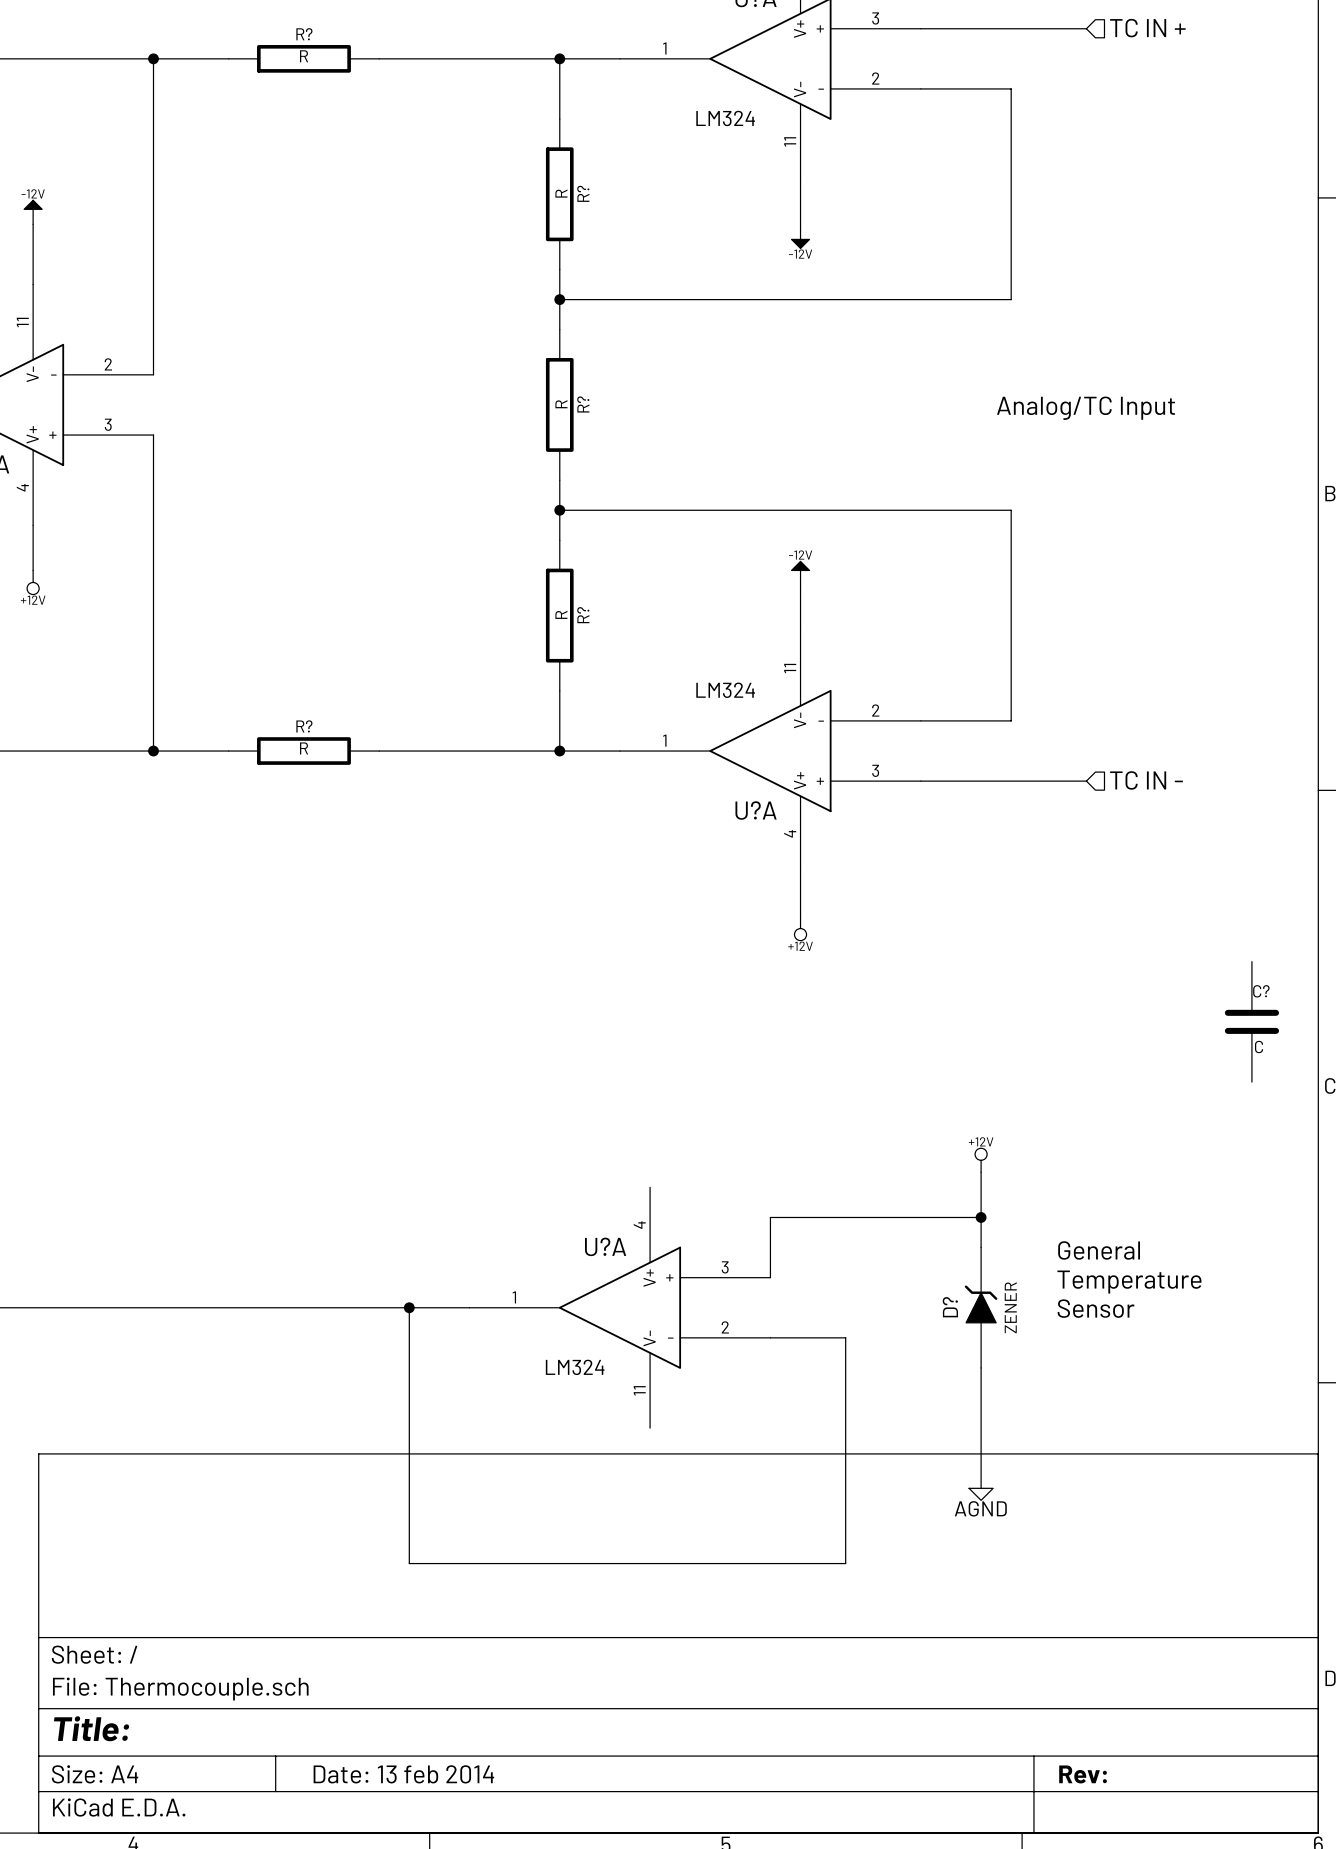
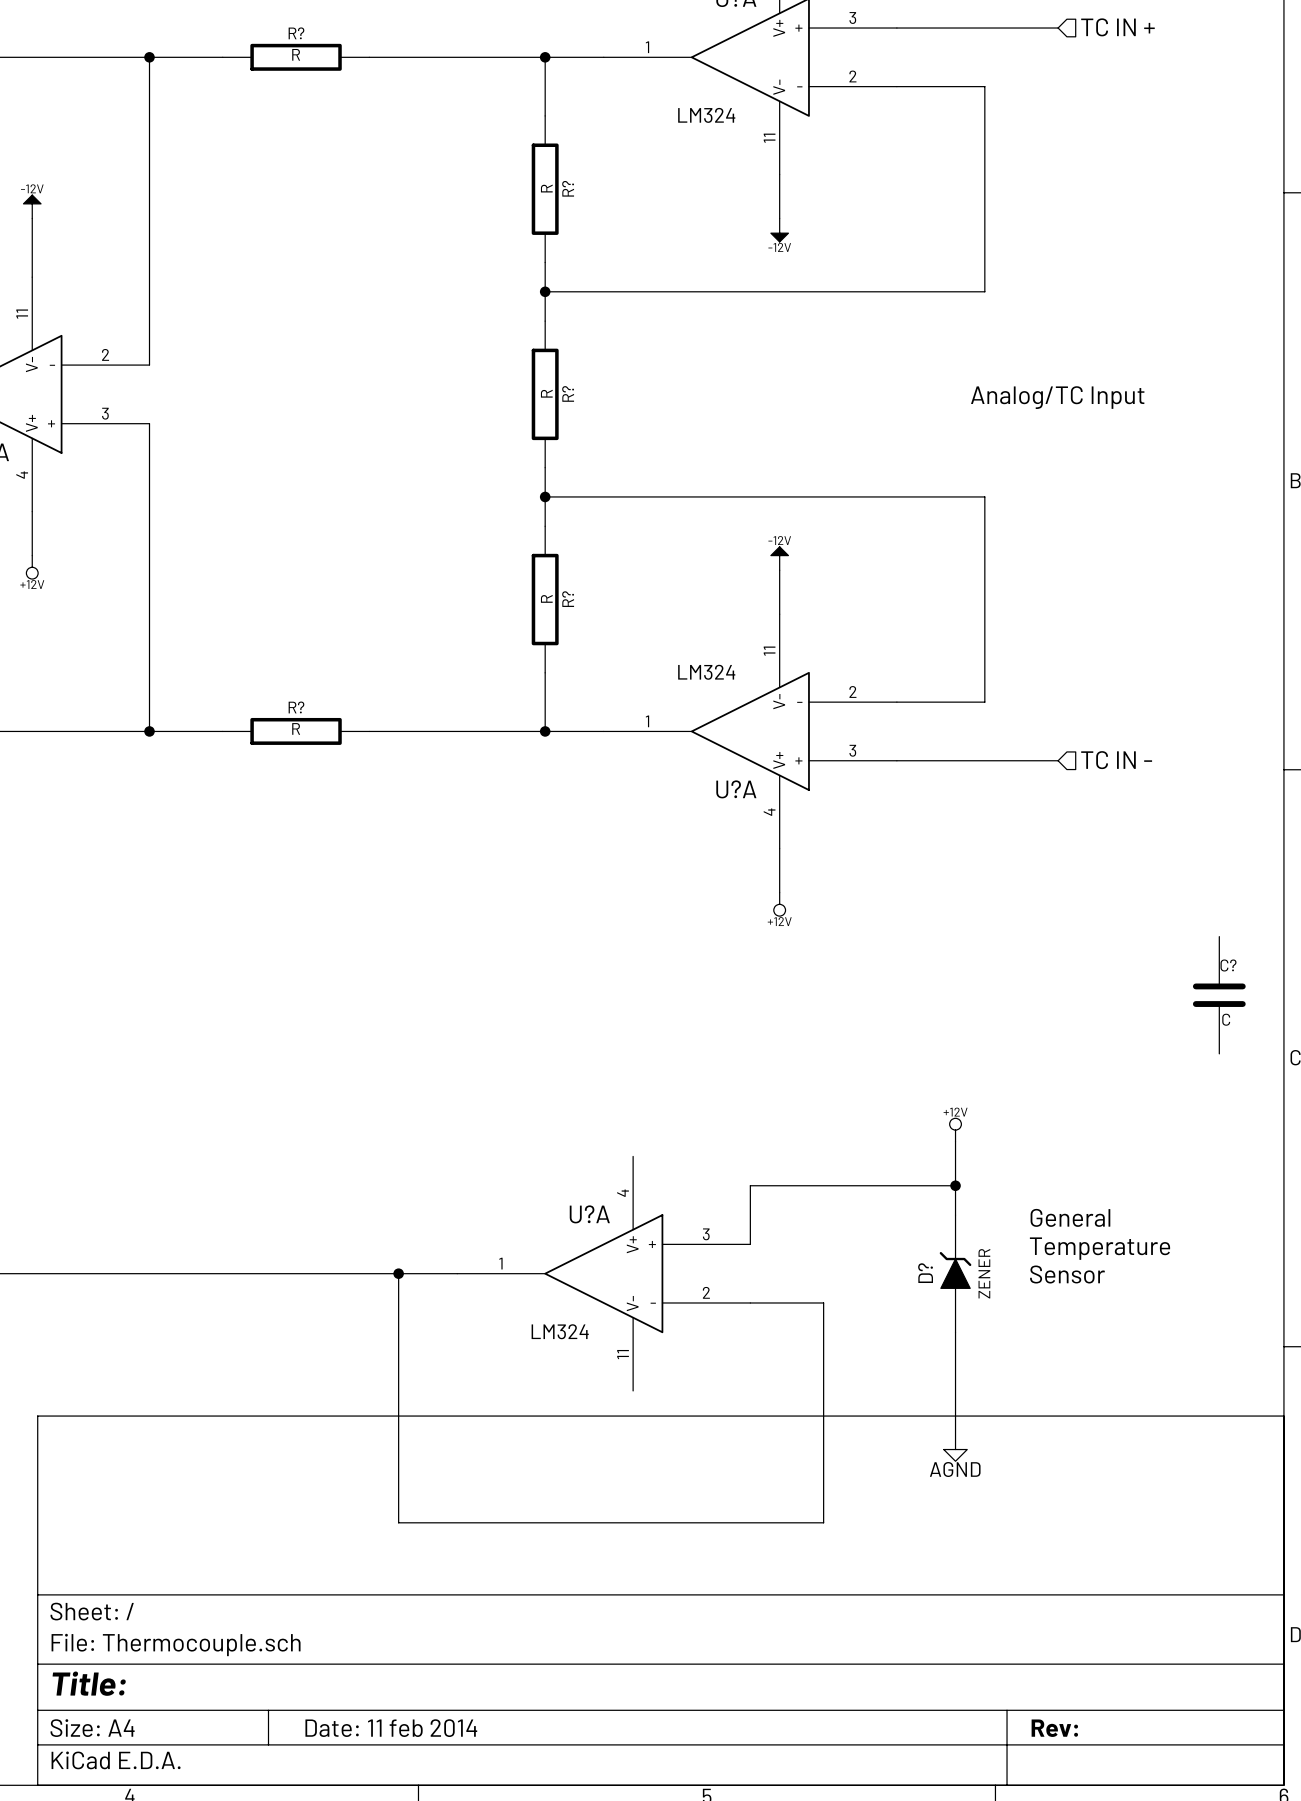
title block: Date: 13 feb 2014 (403, 1774) -> Date: 11 feb 2014 (391, 1728)

